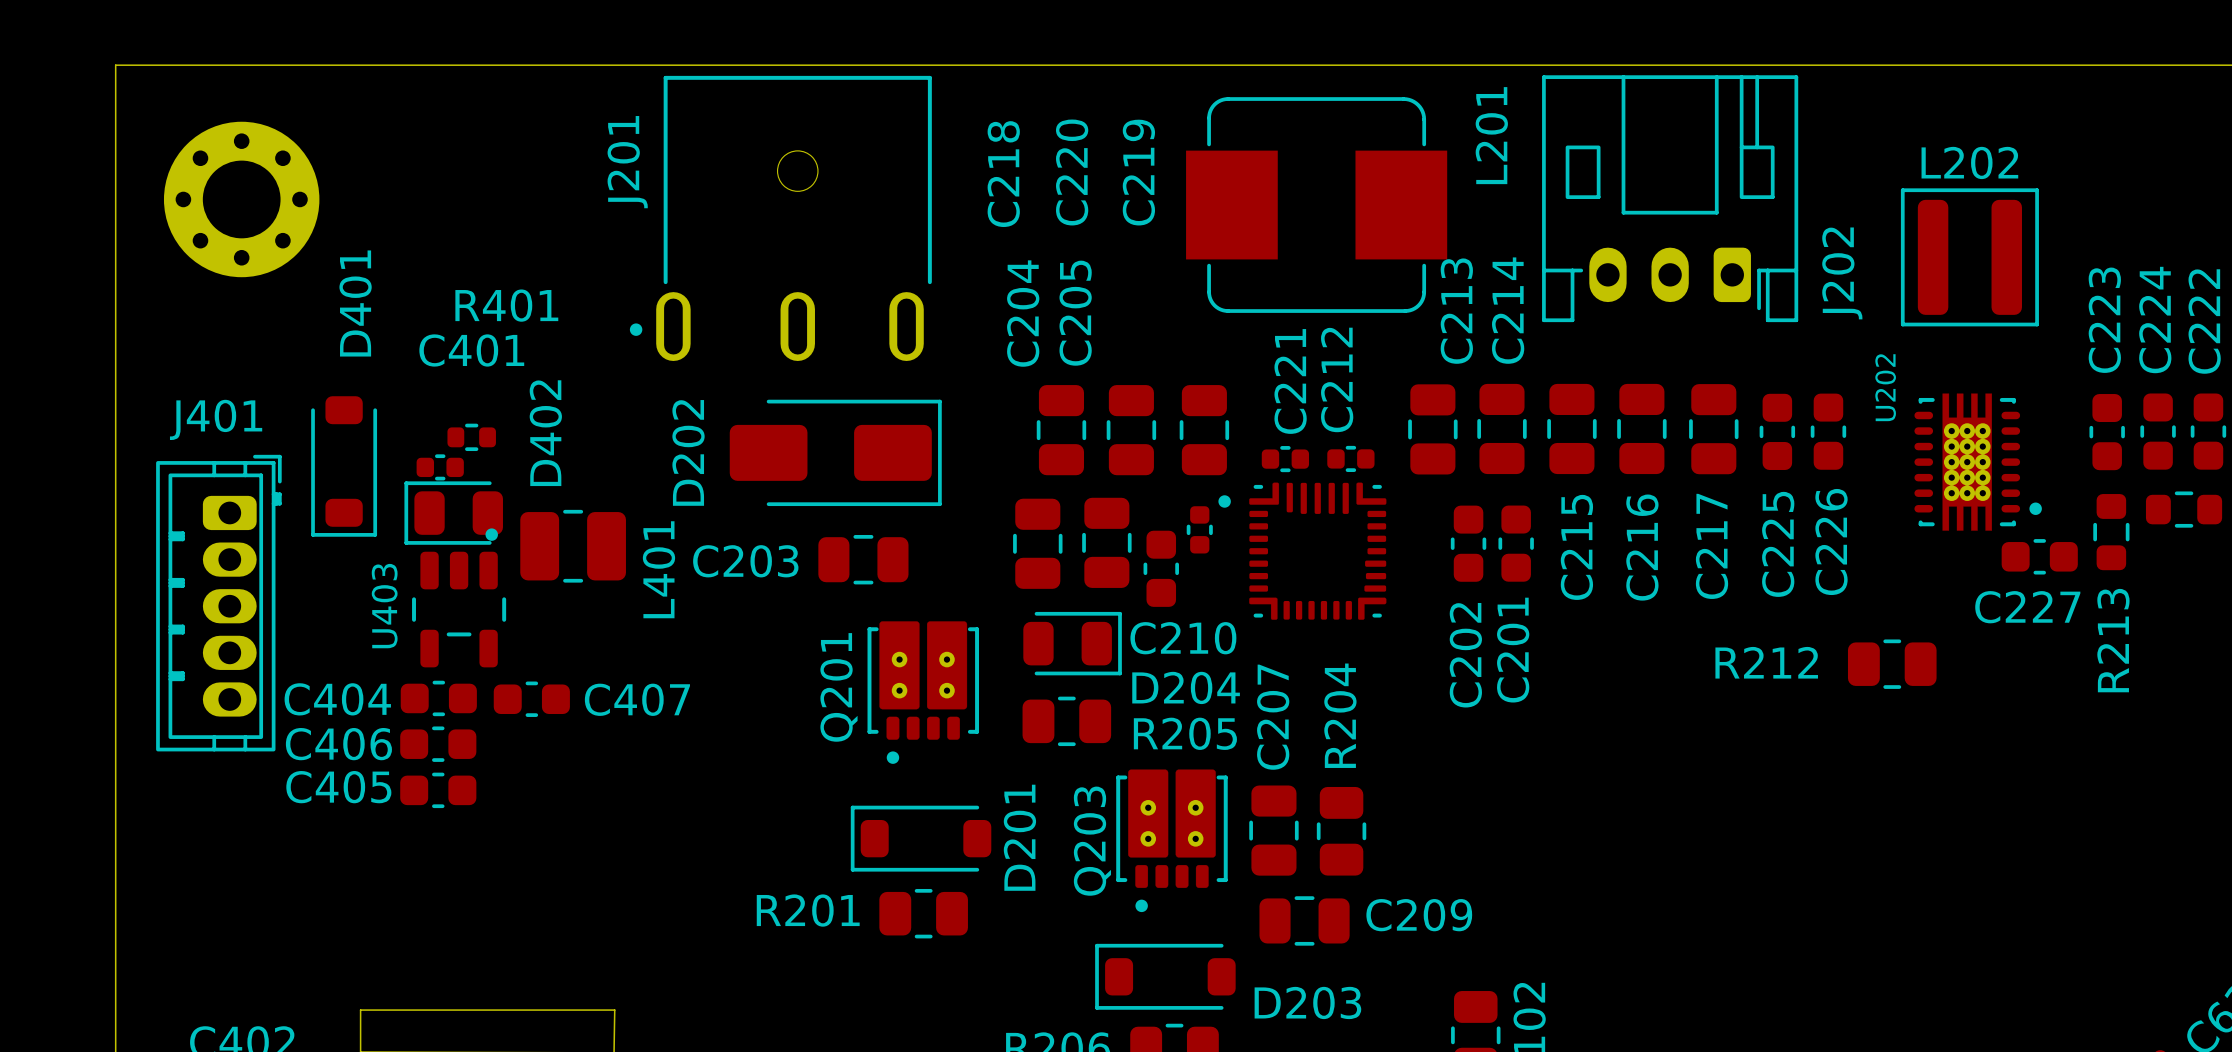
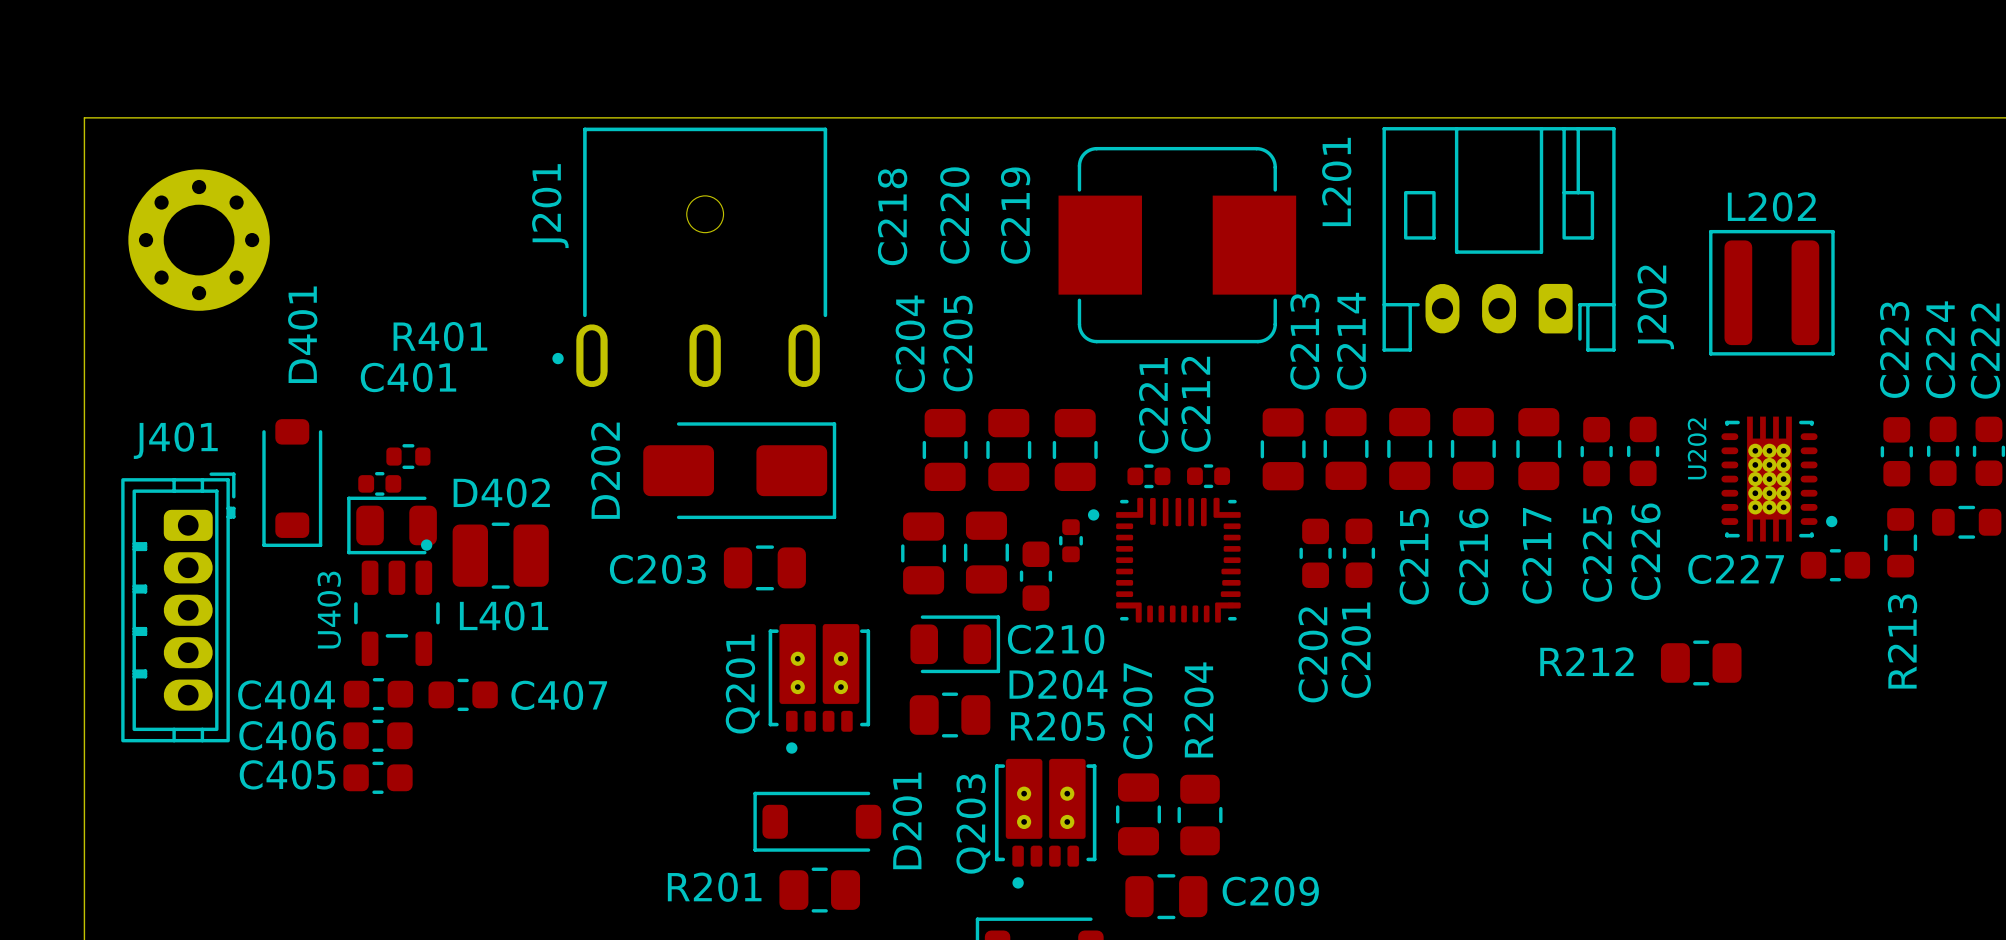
U202 name position: U202 (1885, 387) -> U202 (1697, 448)
D402 name rotation: 0° (545, 433) -> 90° clockwise (501, 492)
L401 name rotation: 0° (658, 569) -> 90° clockwise (504, 616)
C227 name position: C227 (2027, 607) -> C227 (1736, 569)

